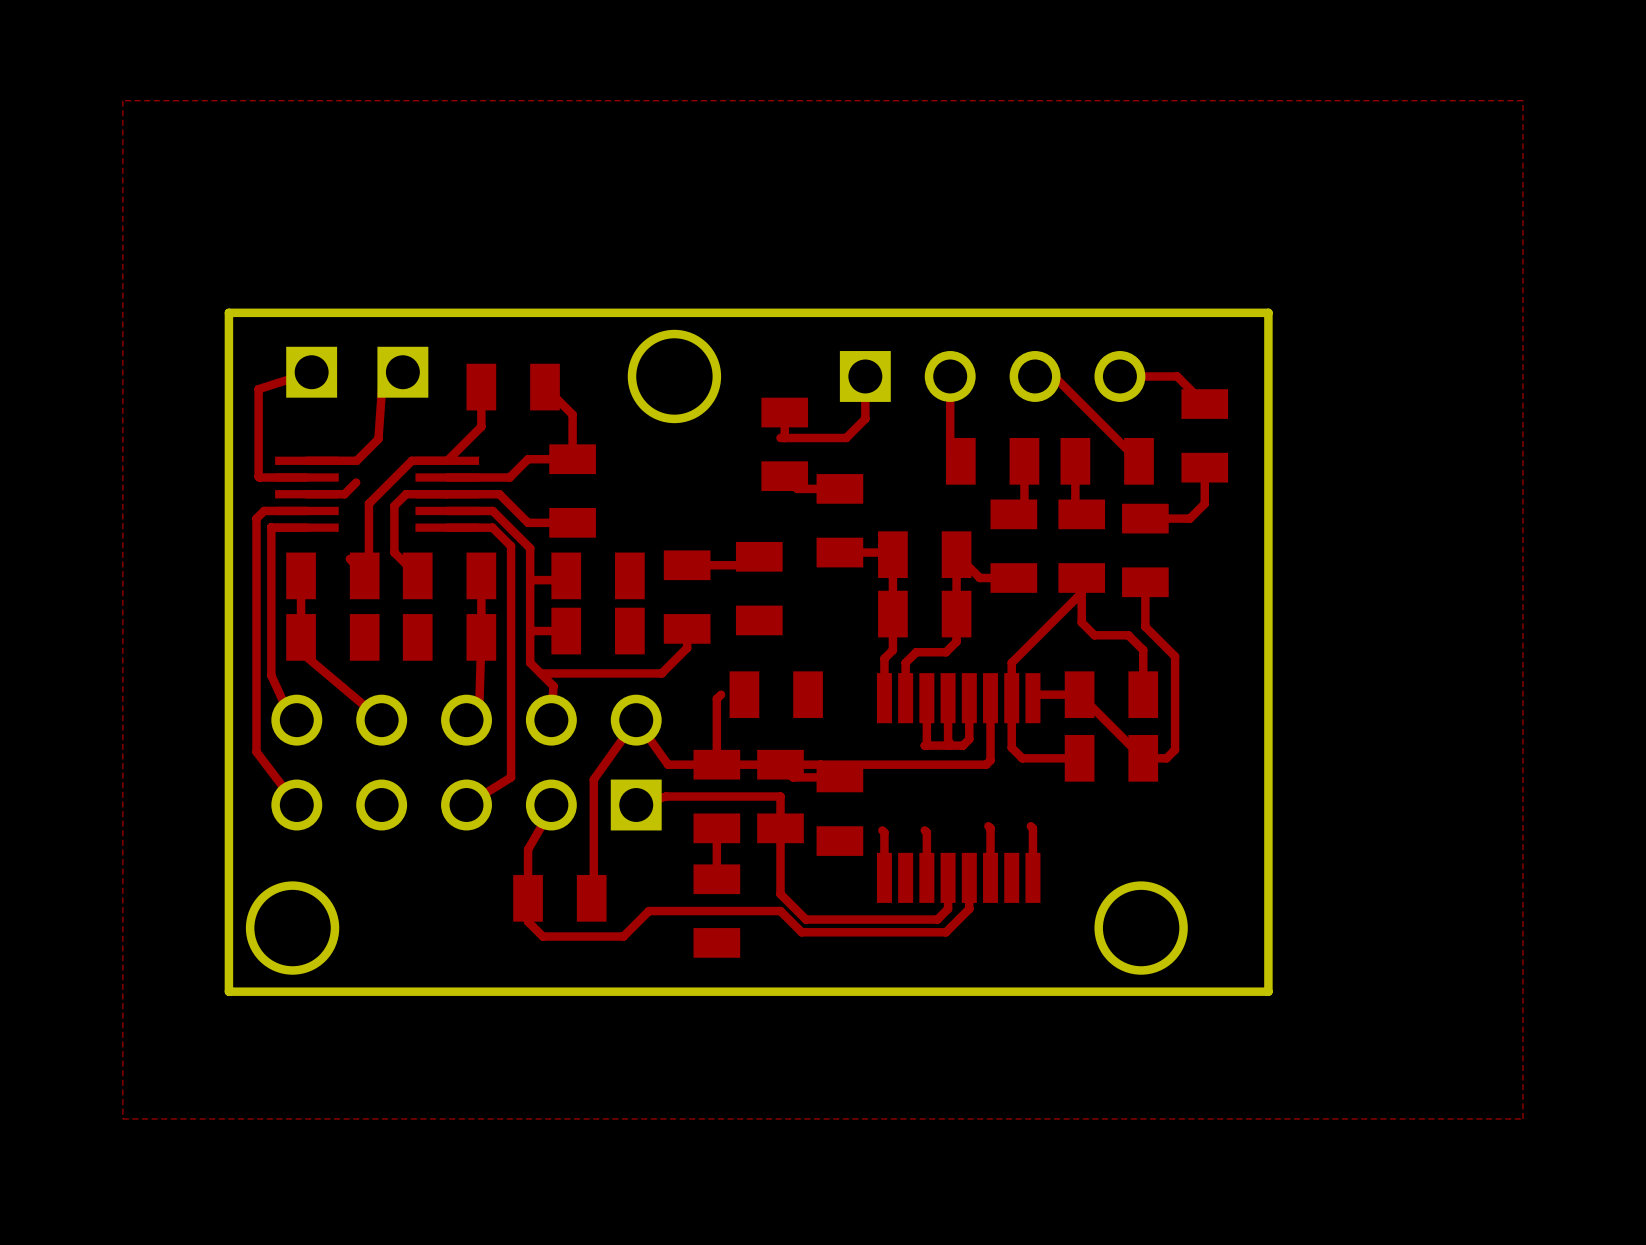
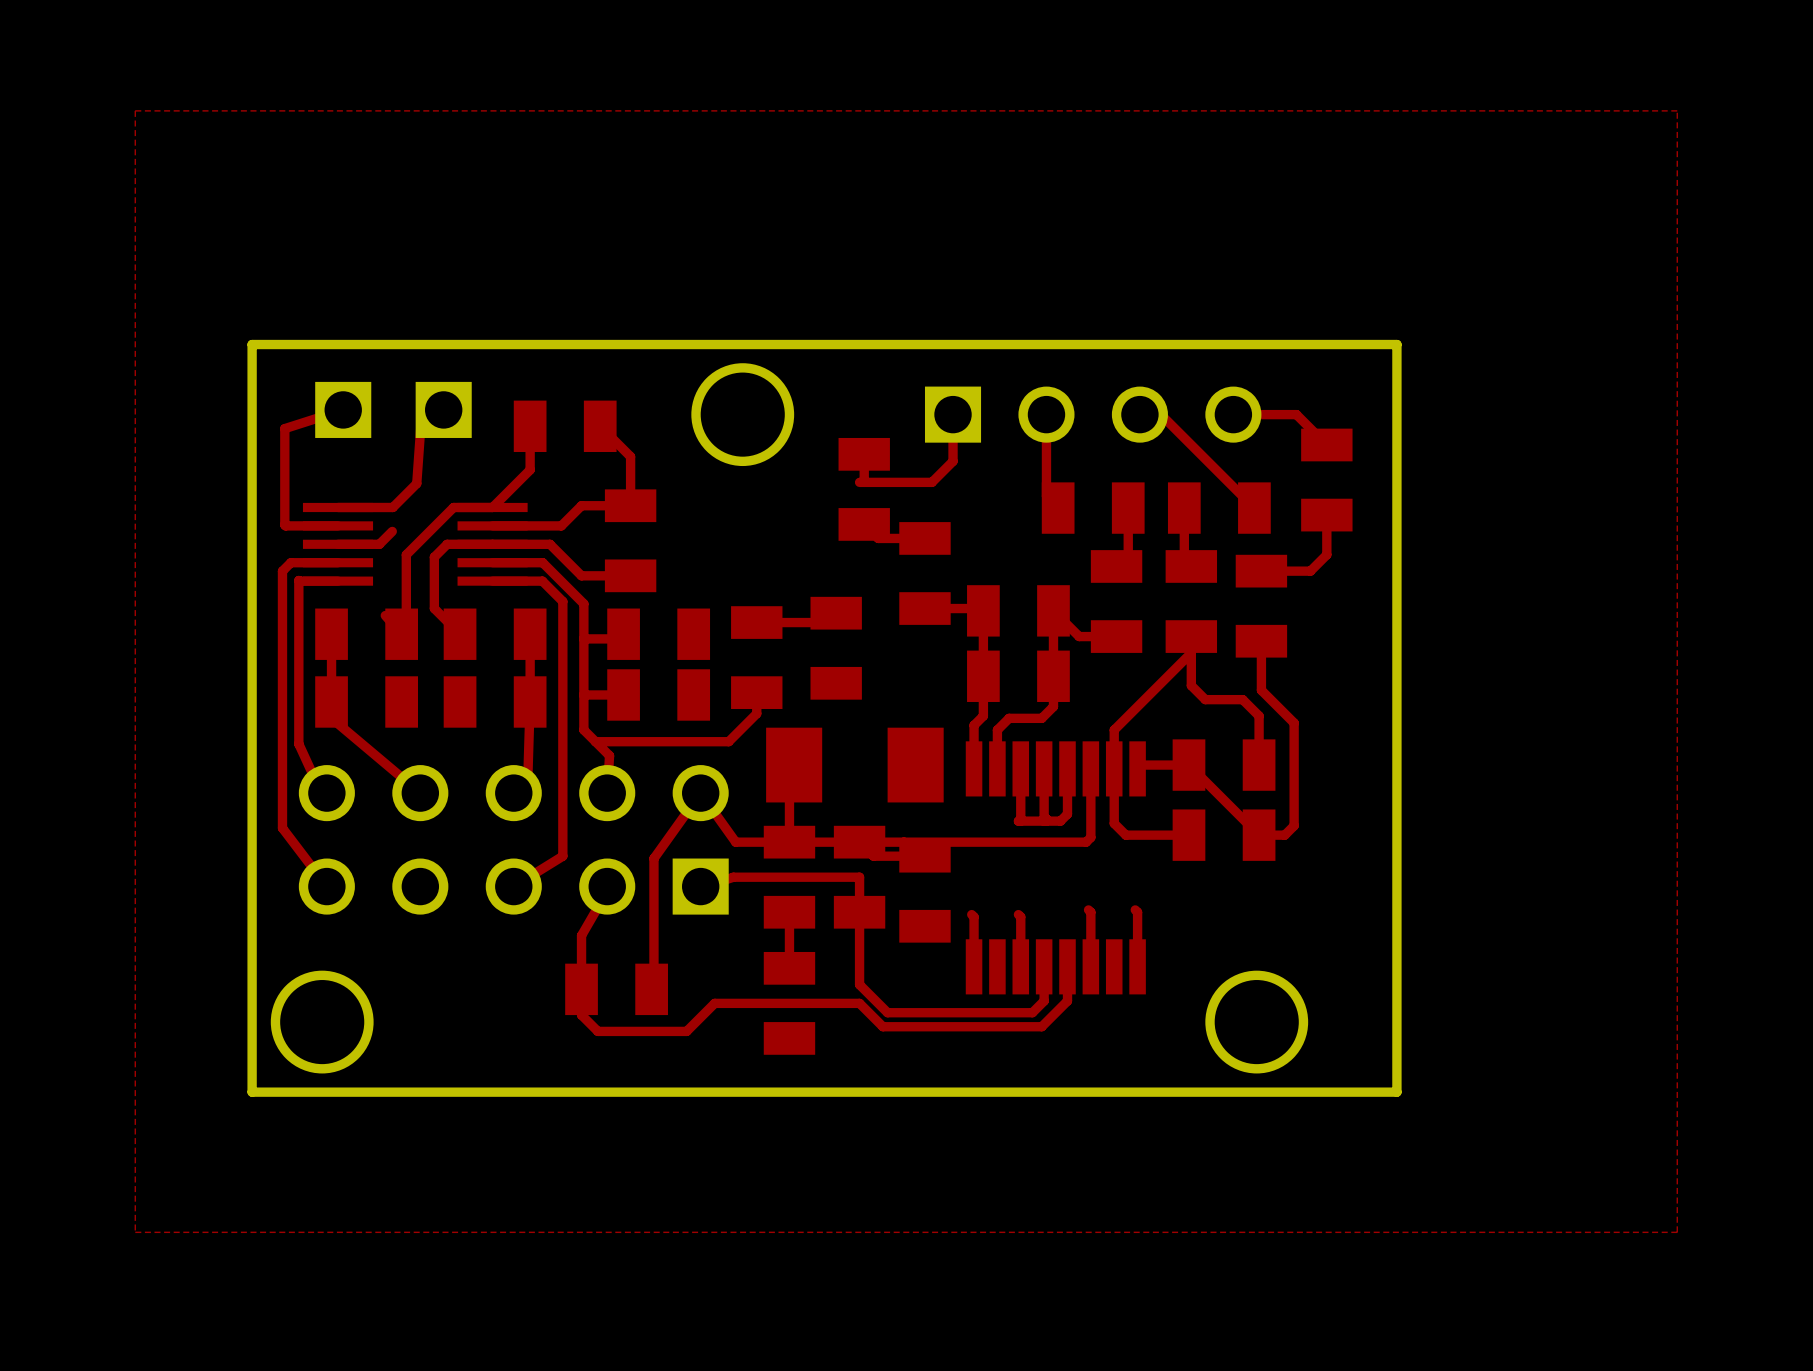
part footprint: [729, 671, 823, 719] -> [766, 727, 944, 803]

